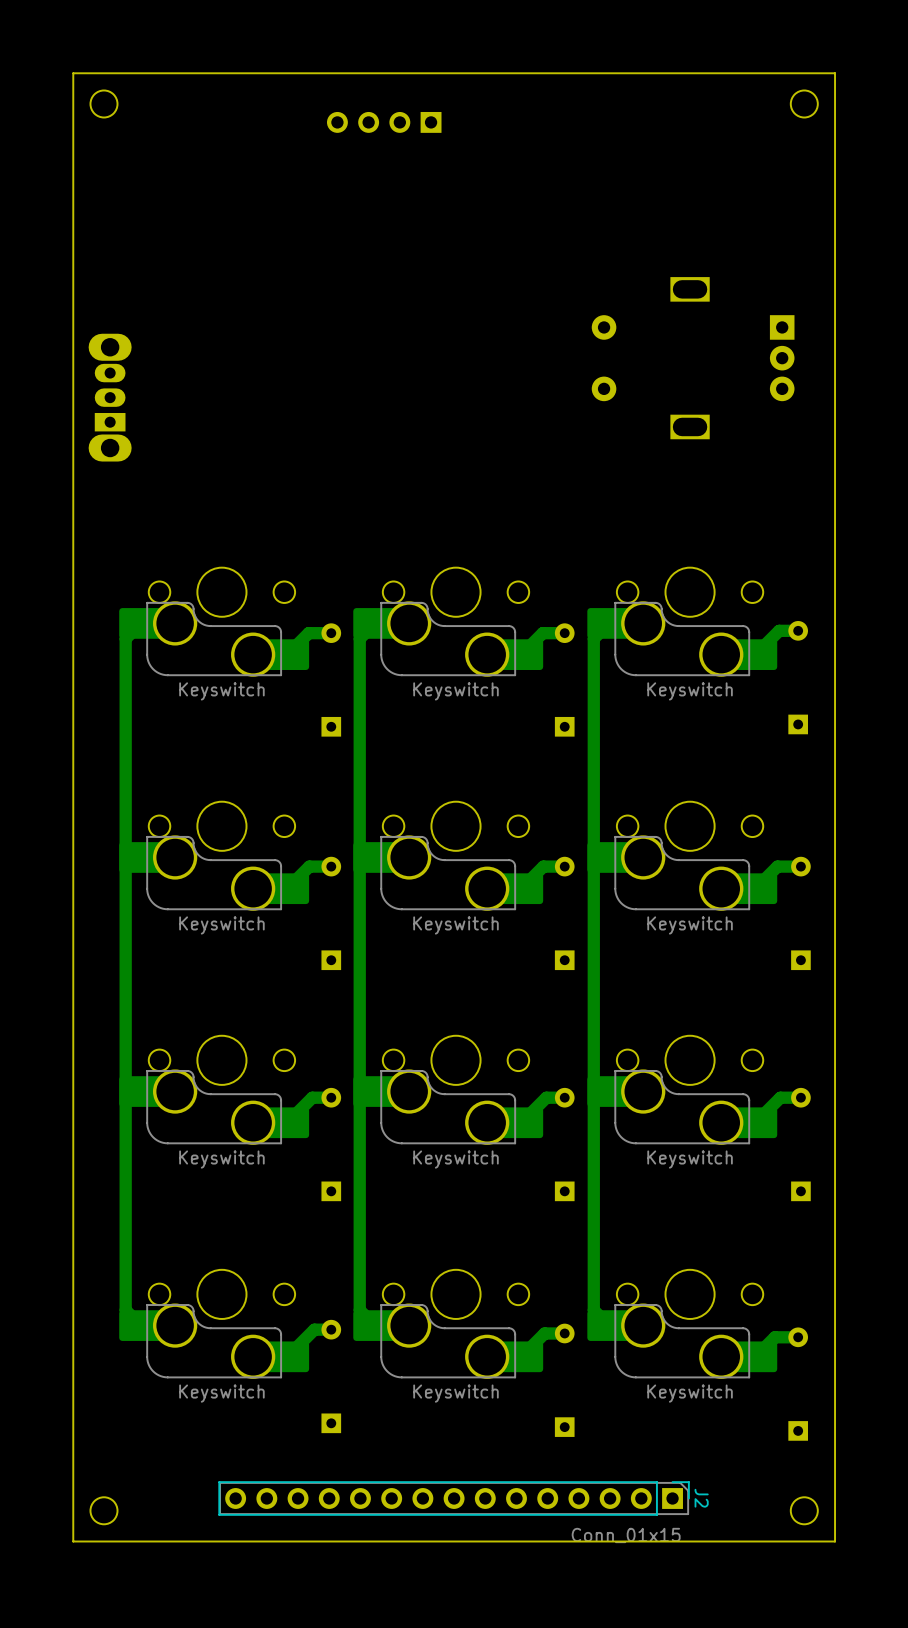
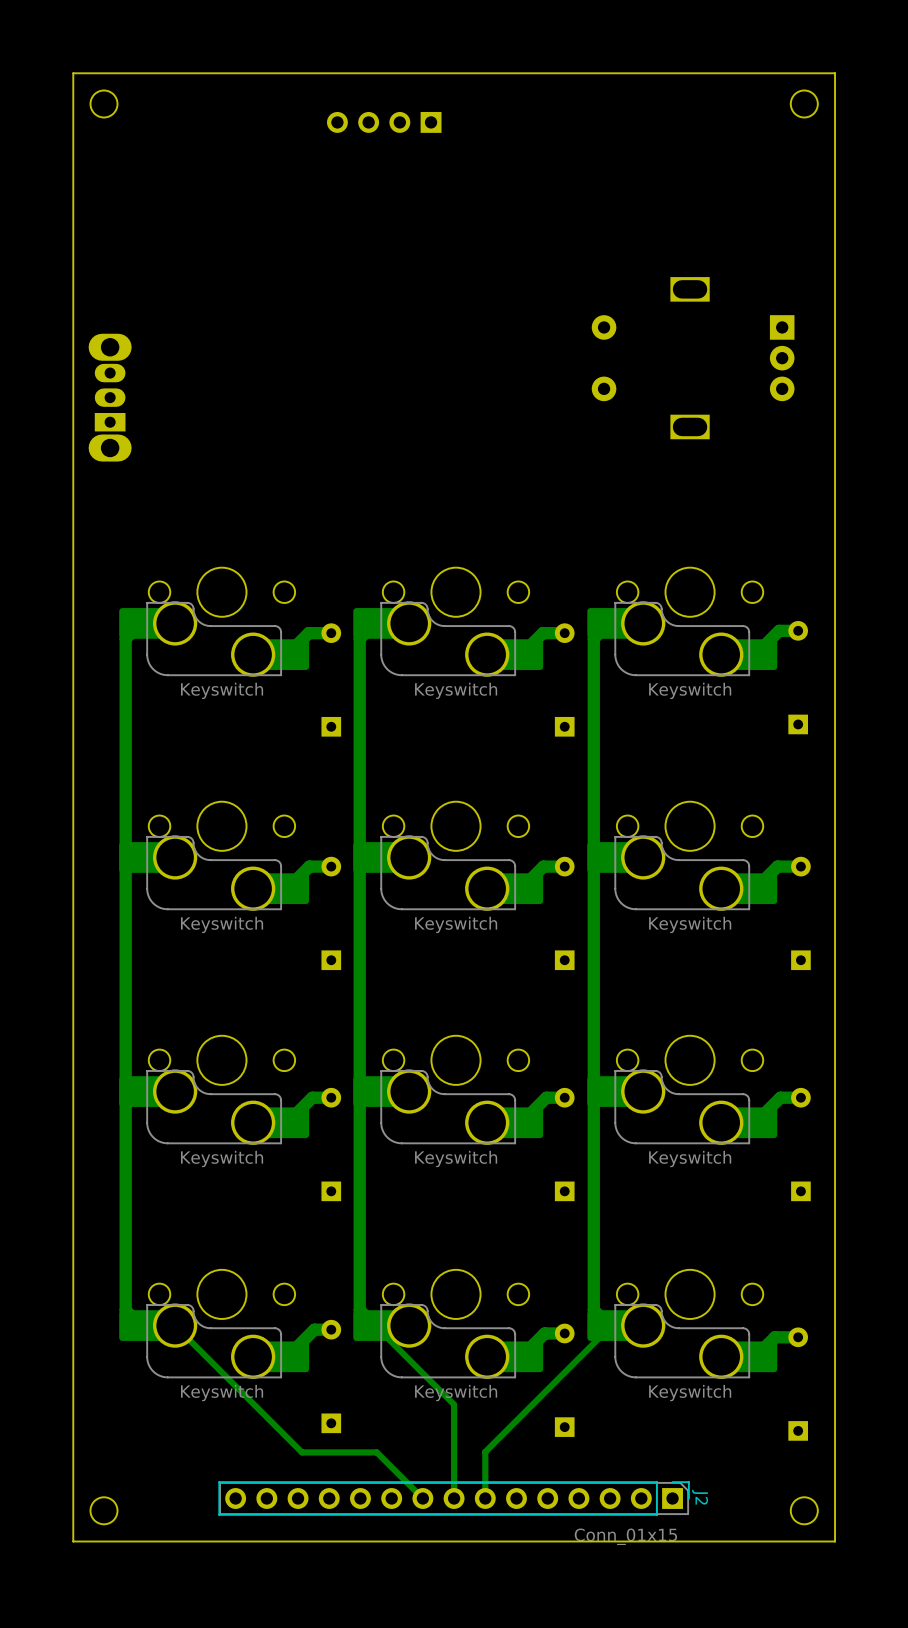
track: none -> (175, 1325) (301, 1452) (376, 1452) (422, 1498)
track: none -> (375, 1325) (454, 1404) (454, 1498)
track: none -> (609, 1325) (609, 1328) (485, 1451) (485, 1498)

